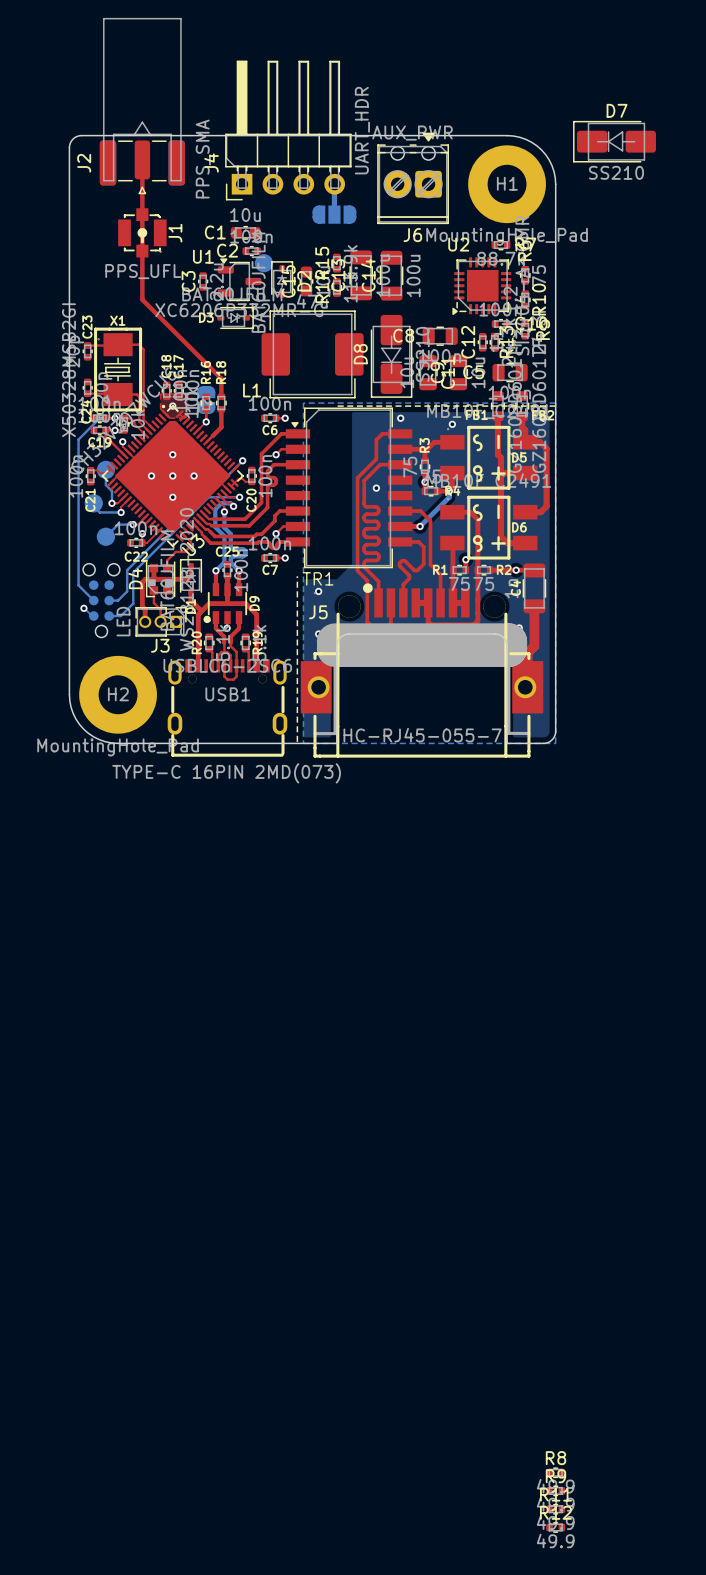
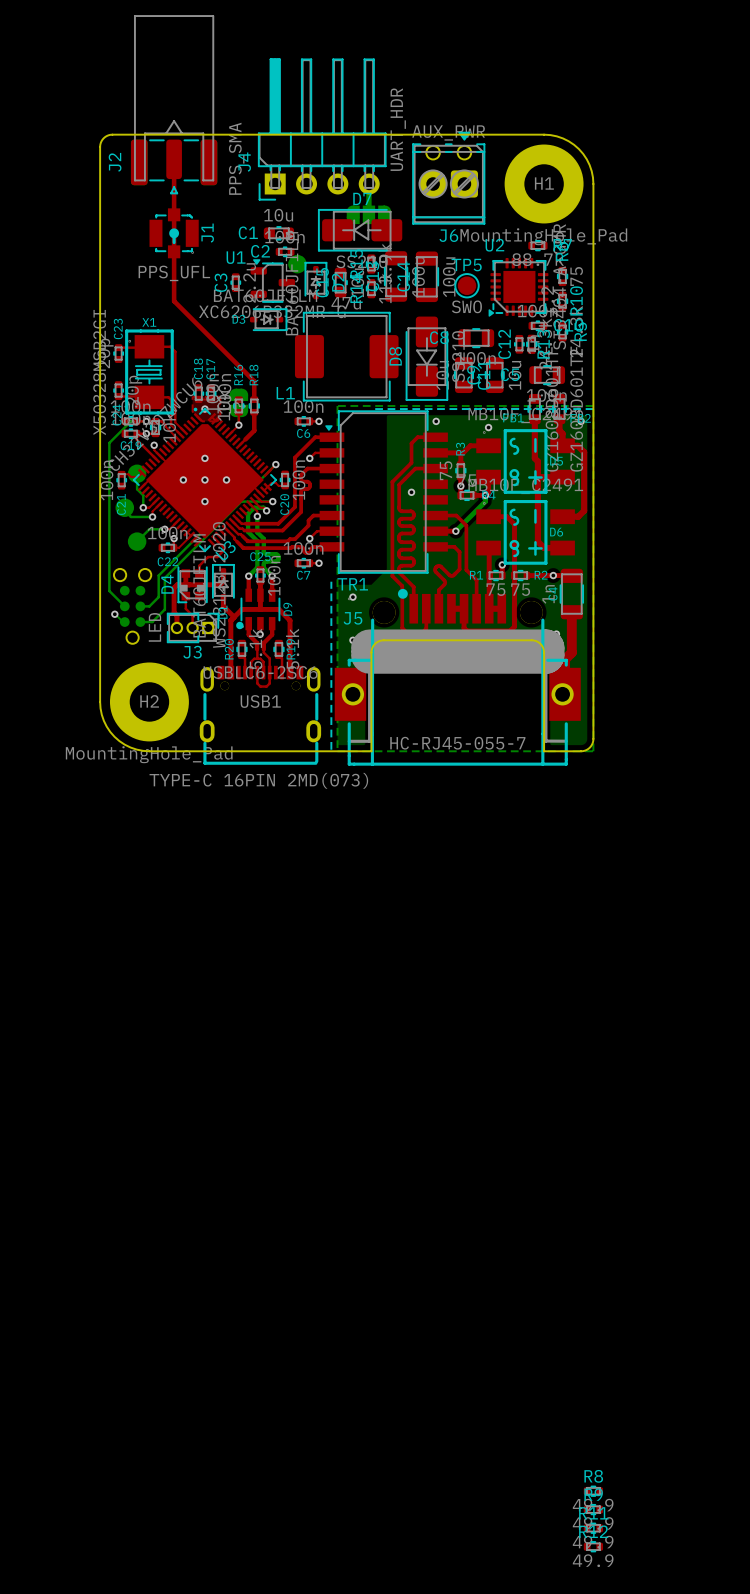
D7 position: (614, 141) -> (360, 230)
TP5: none -> SWO (467, 285)

